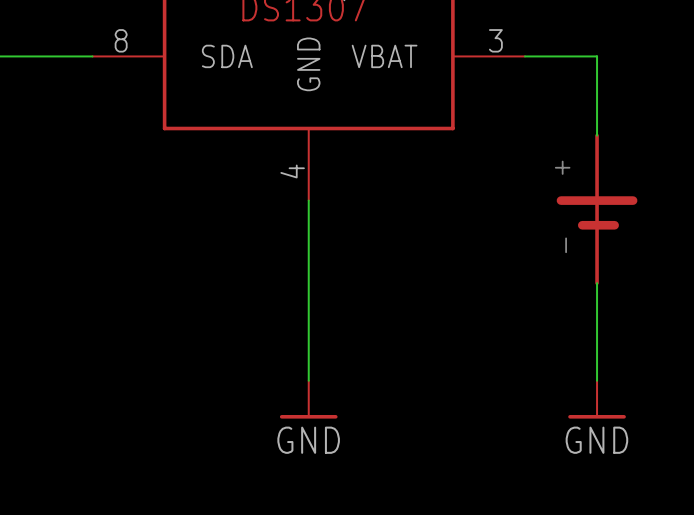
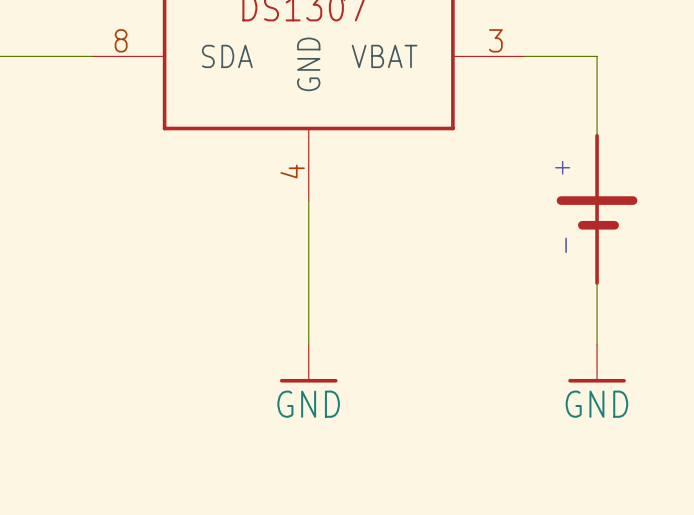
power symbol position: GND (308, 399) -> GND (308, 363)
power symbol position: GND (597, 399) -> GND (597, 363)

